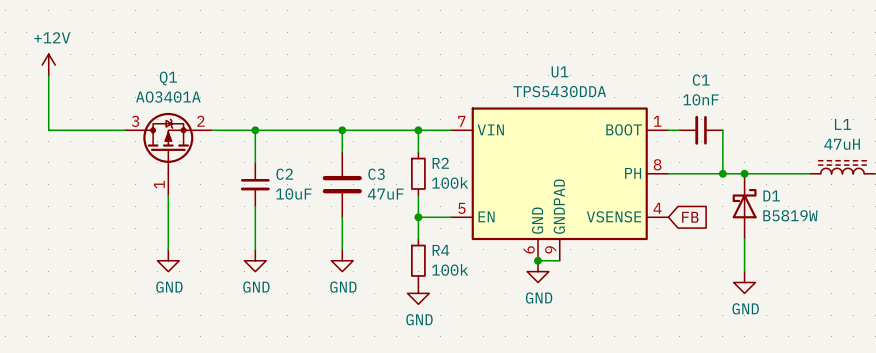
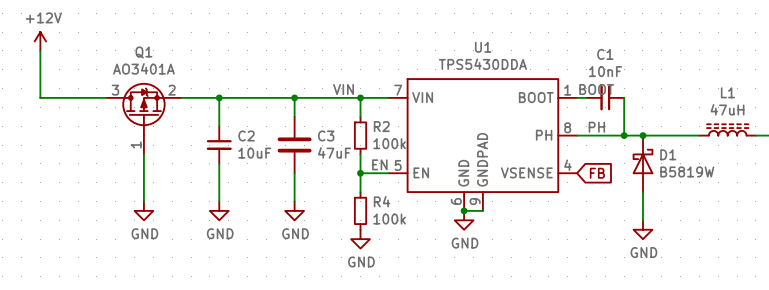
label: none -> VIN (343, 89)
label: none -> BOOT (596, 89)
label: none -> PH (596, 127)
label: none -> EN (379, 164)

